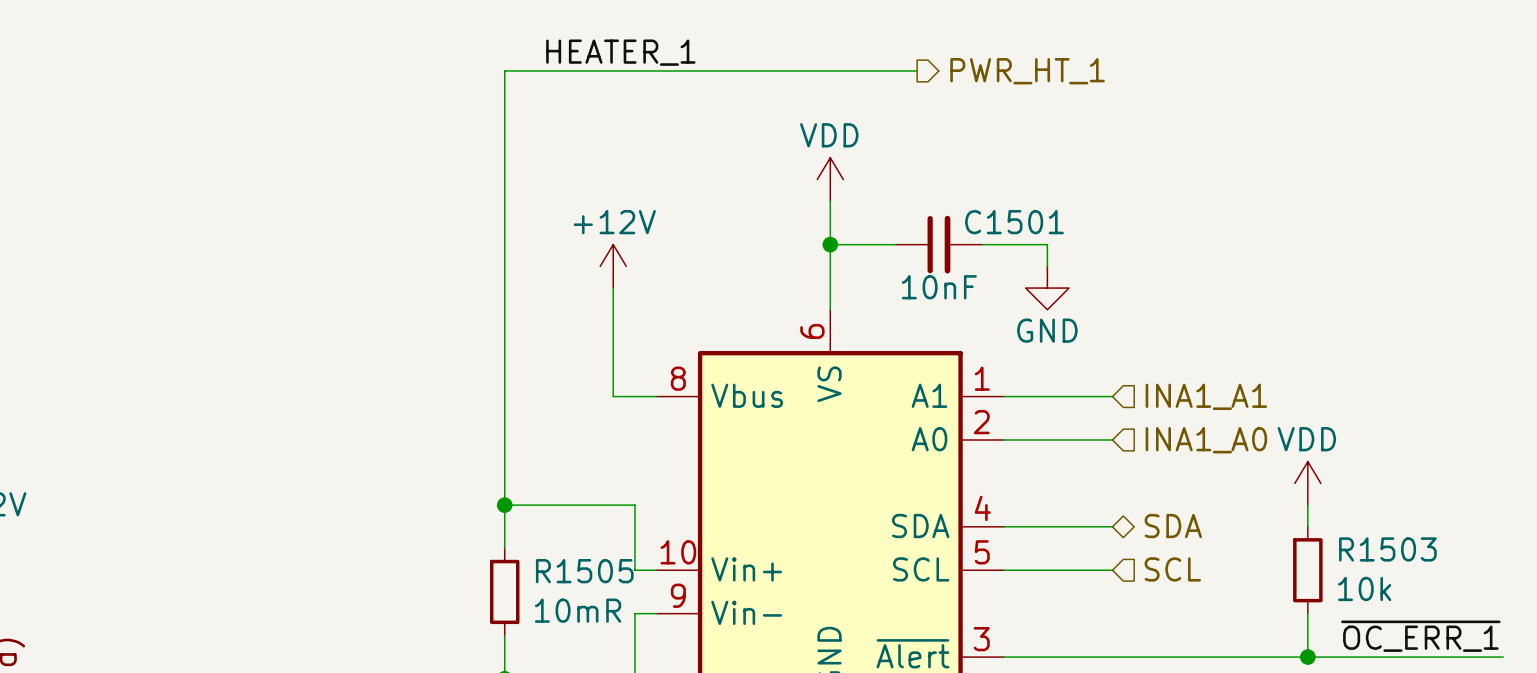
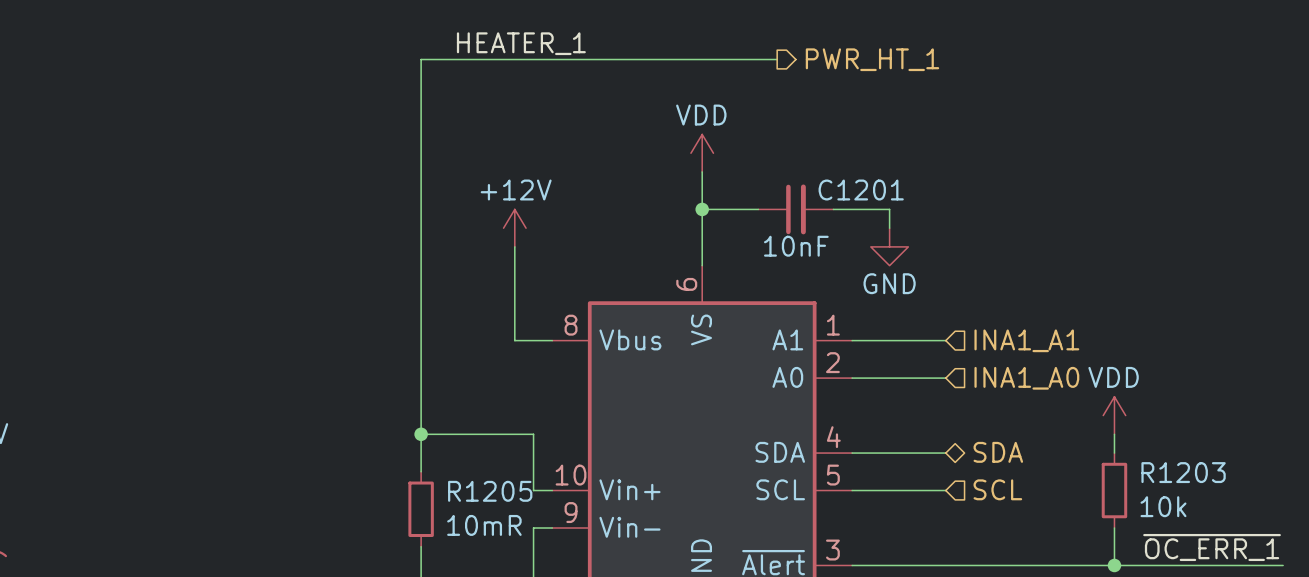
C1501 name: C1501 (1014, 222) -> C1201 (861, 190)
R1503 name: R1503 (1387, 549) -> R1203 (1183, 472)
R1505 name: R1505 (584, 571) -> R1205 (490, 491)

